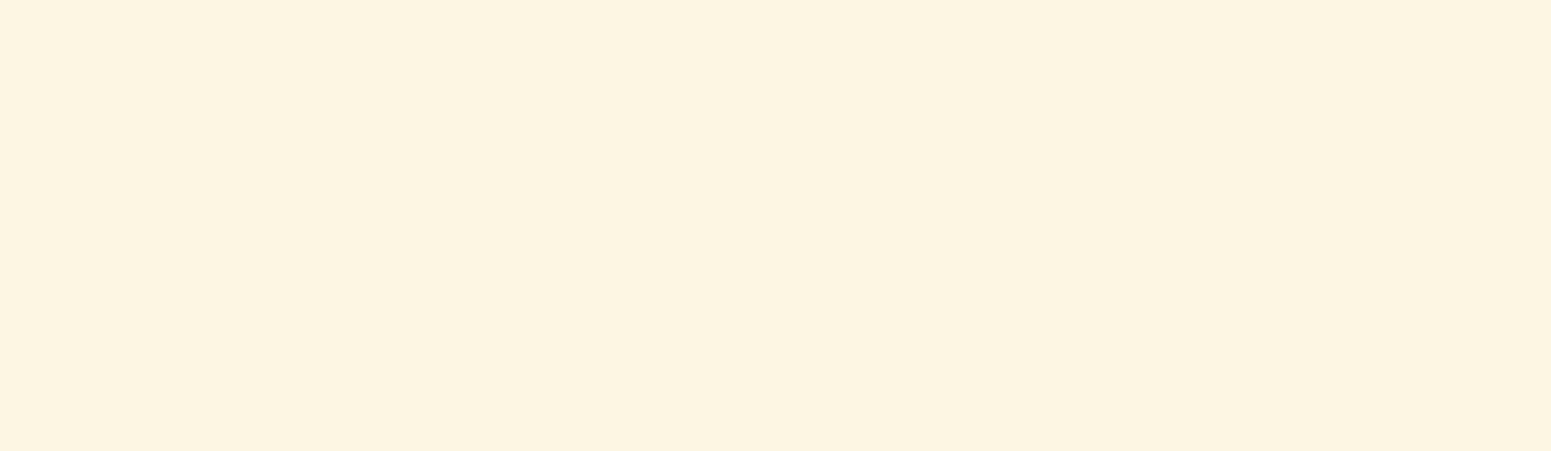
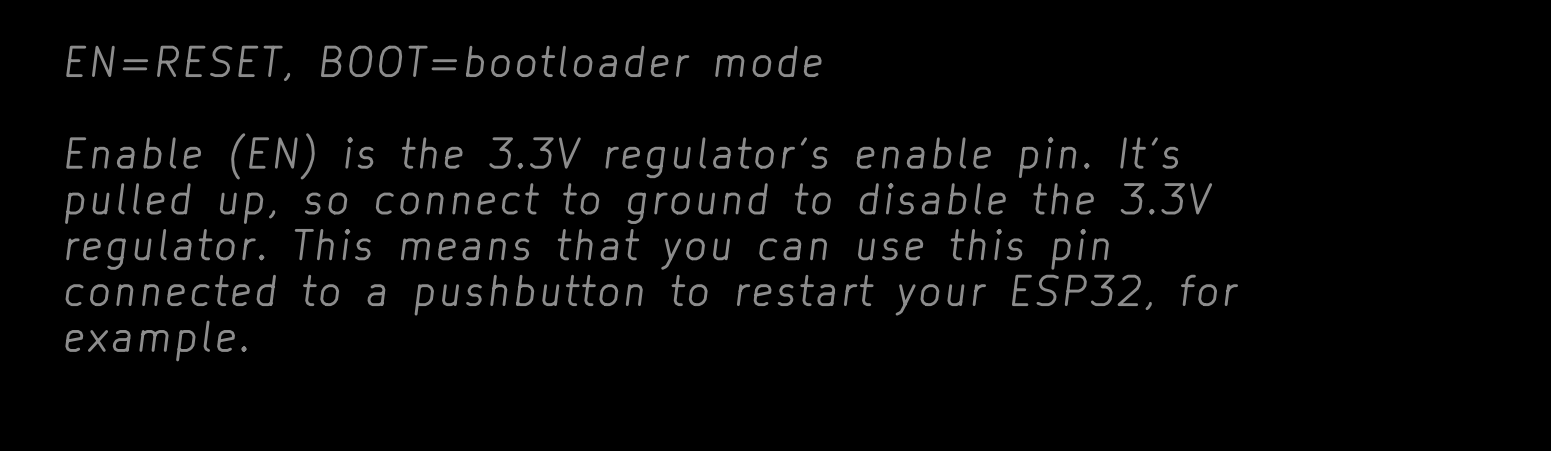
text: none -> EN=RESET, BOOT=bootloader mode (443, 63)
text: none -> Enable (EN) is the 3.3V regulator's enable pin. It's (622, 156)
text: none -> pulled up, so connect to ground to disable the 3.3V (638, 203)
text: none -> regulator. This means that you can use this pin (587, 249)
text: none -> connected to a pushbutton to restart your ESP32, for (651, 295)
text: none -> example. (156, 340)

